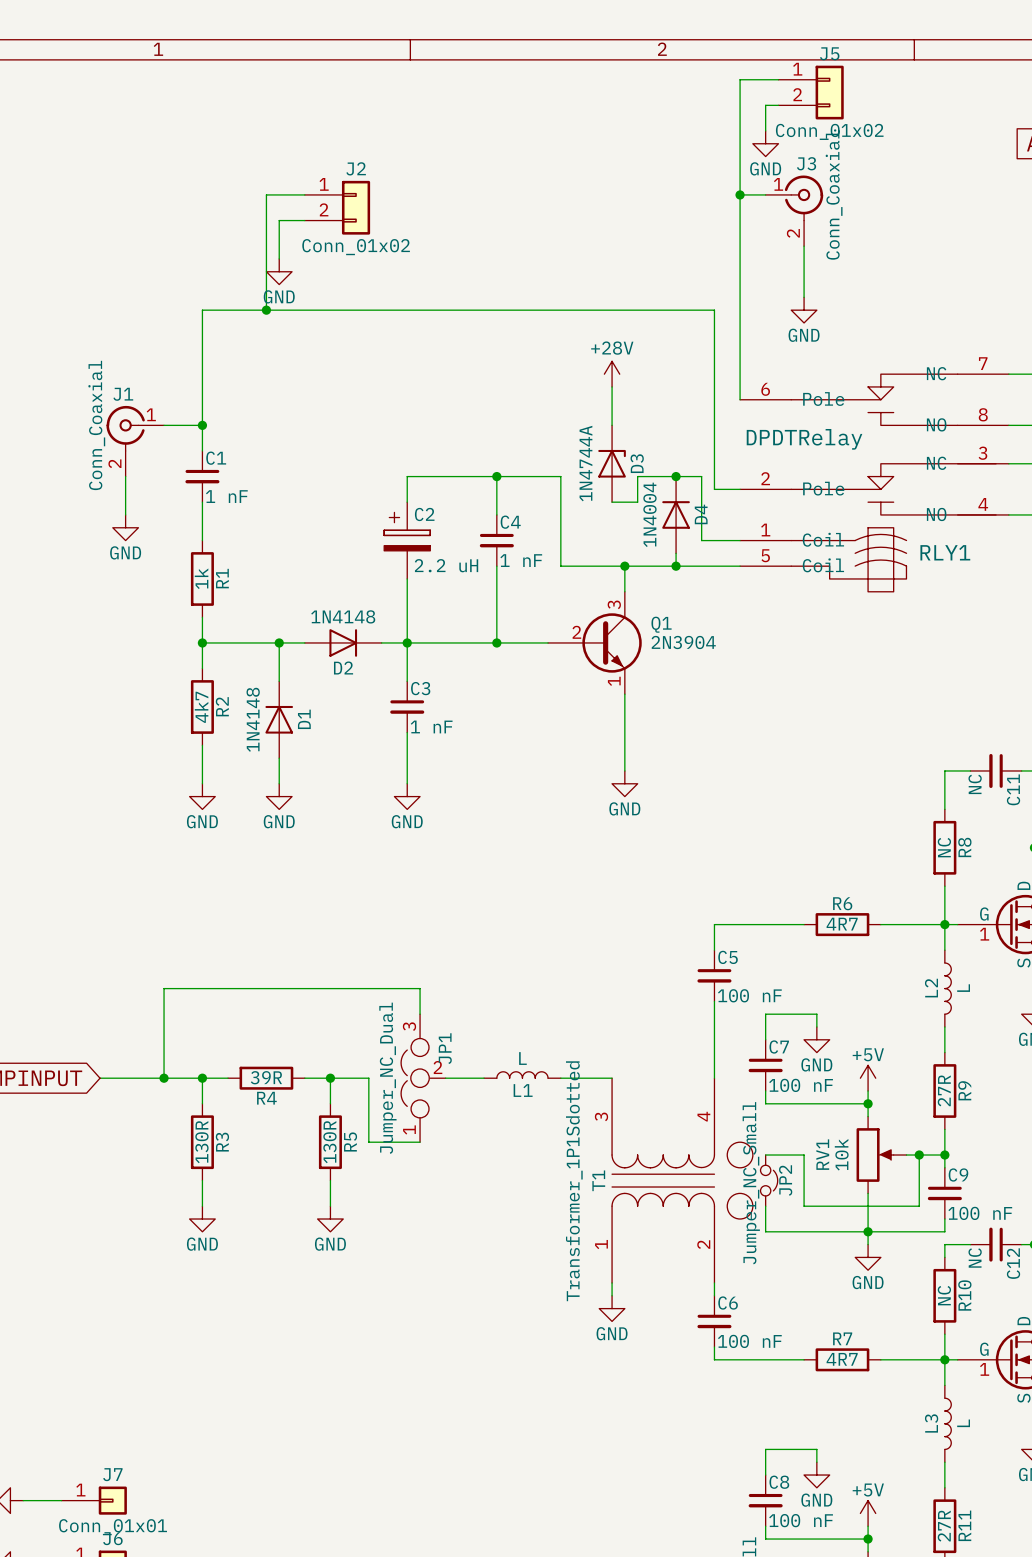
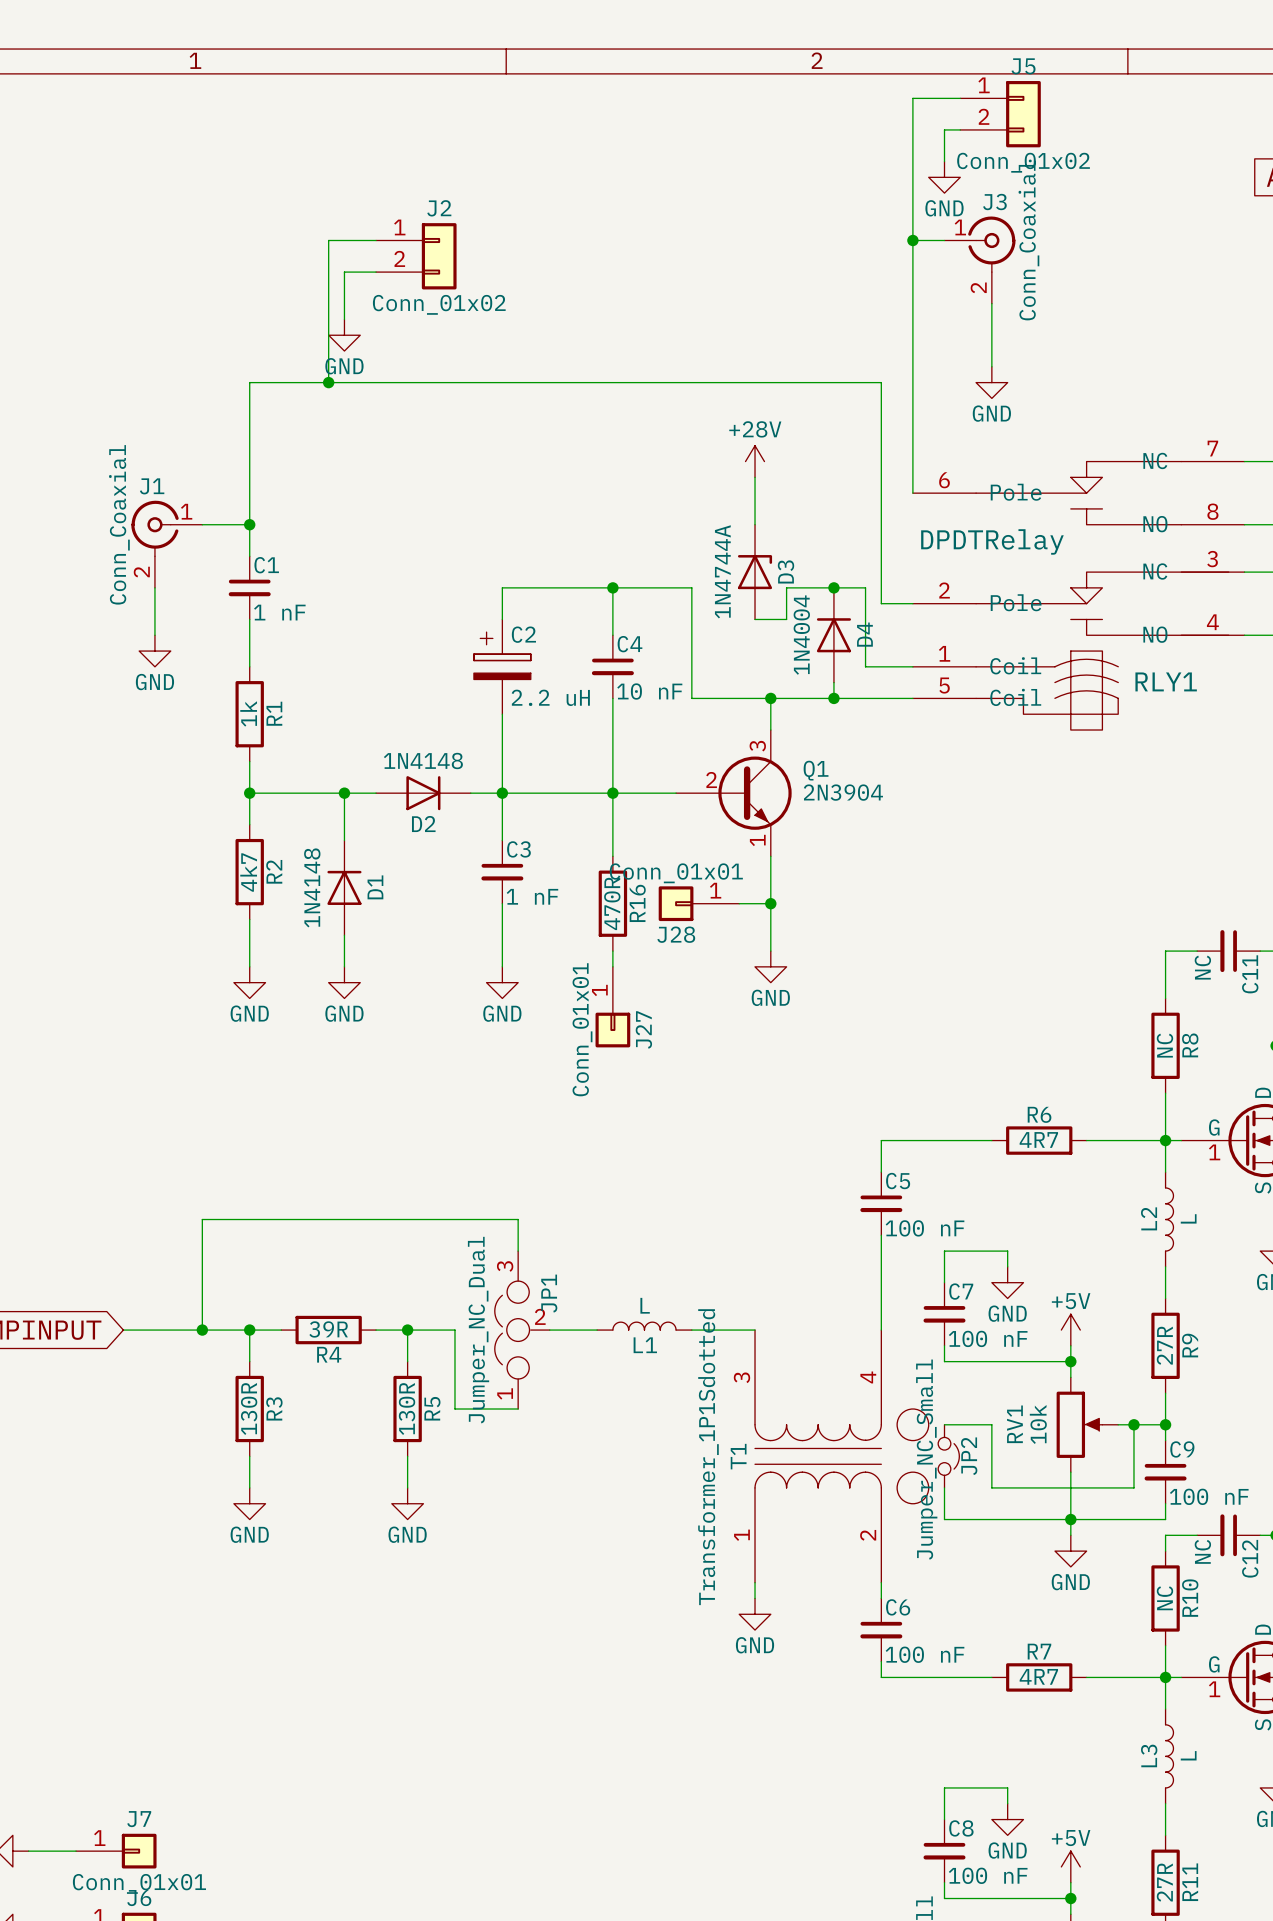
C4 value: 1 nF (521, 560) -> 10 nF (649, 691)
wire: none -> (612, 793) (612, 856)
R16: none -> 470R (612, 903)
J28: none -> Conn_01x01 (698, 903)
wire: none -> (739, 903) (770, 903)
junction: none -> (770, 903)
wire: none -> (612, 951) (612, 966)
J27: none -> Conn_01x01 (612, 1007)

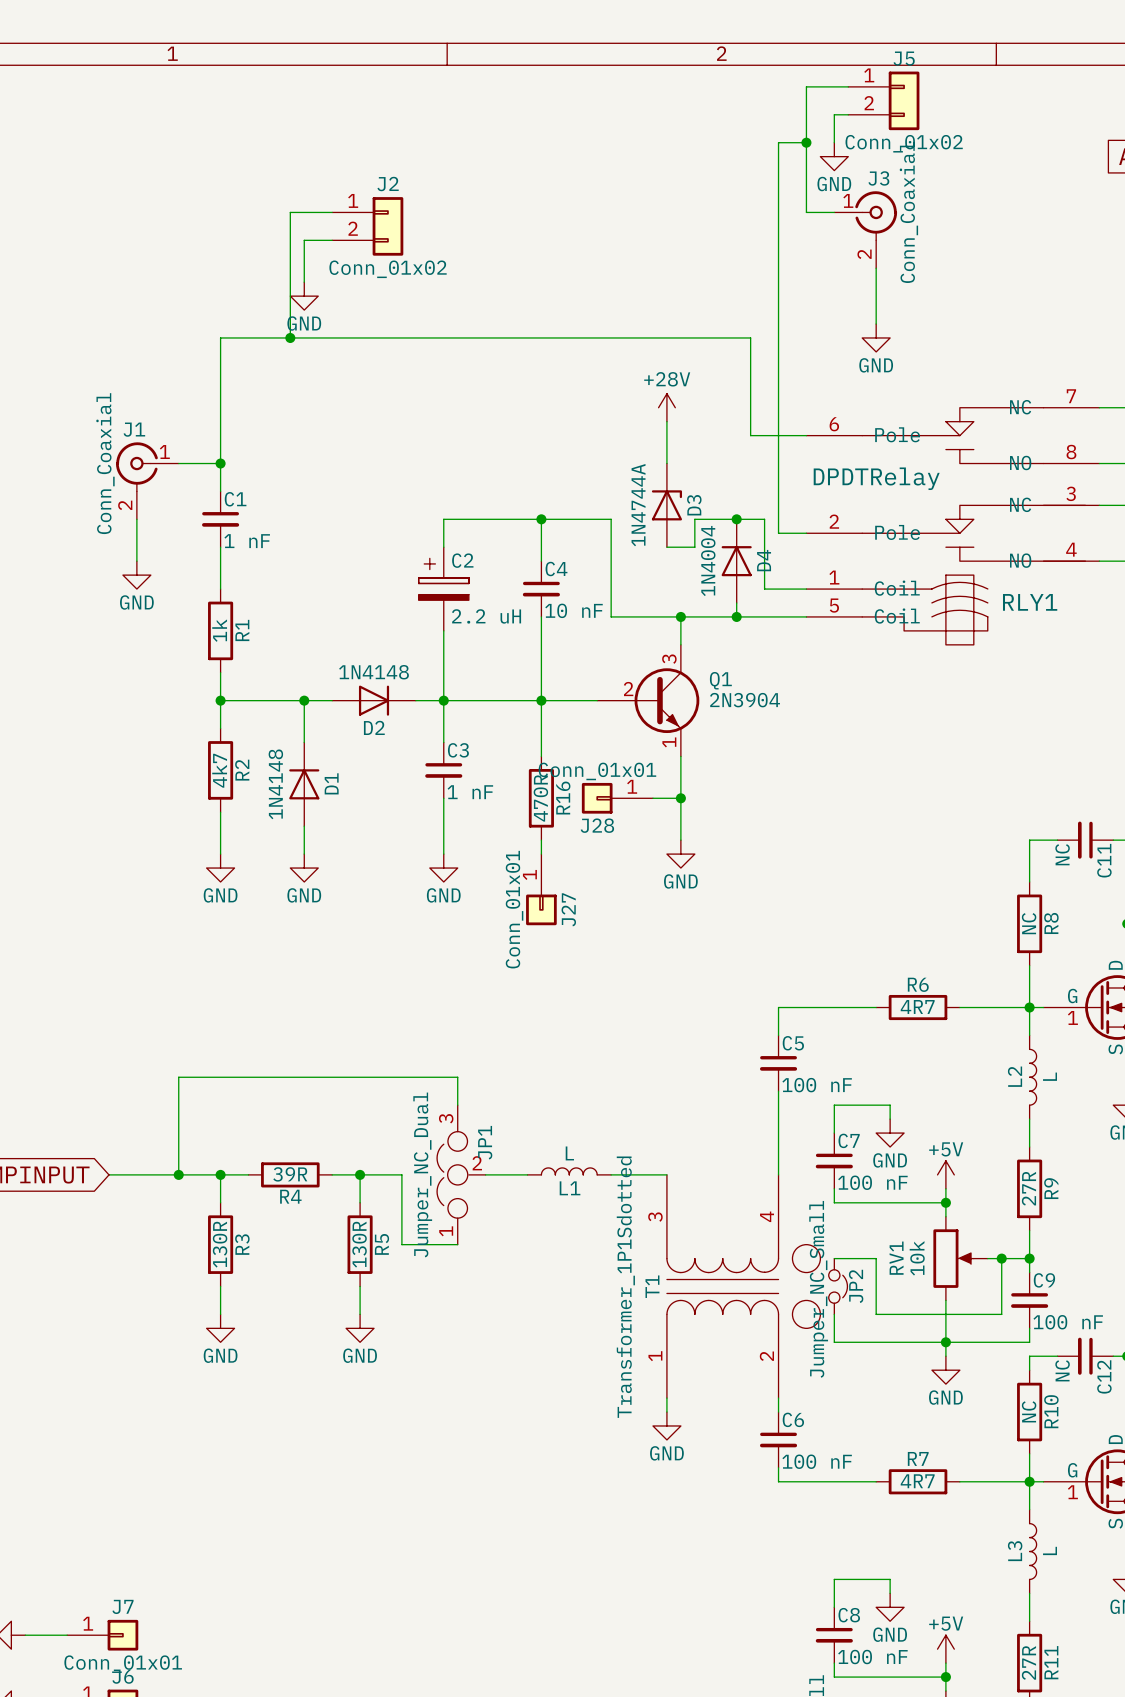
wire: none -> (806, 142) (778, 142) (778, 337)
junction: none -> (806, 142)
wire: (912, 240) (912, 493) -> none
junction: (912, 240) -> none
wire: (849, 382) (881, 382) -> (750, 337) (750, 435) (806, 435)

